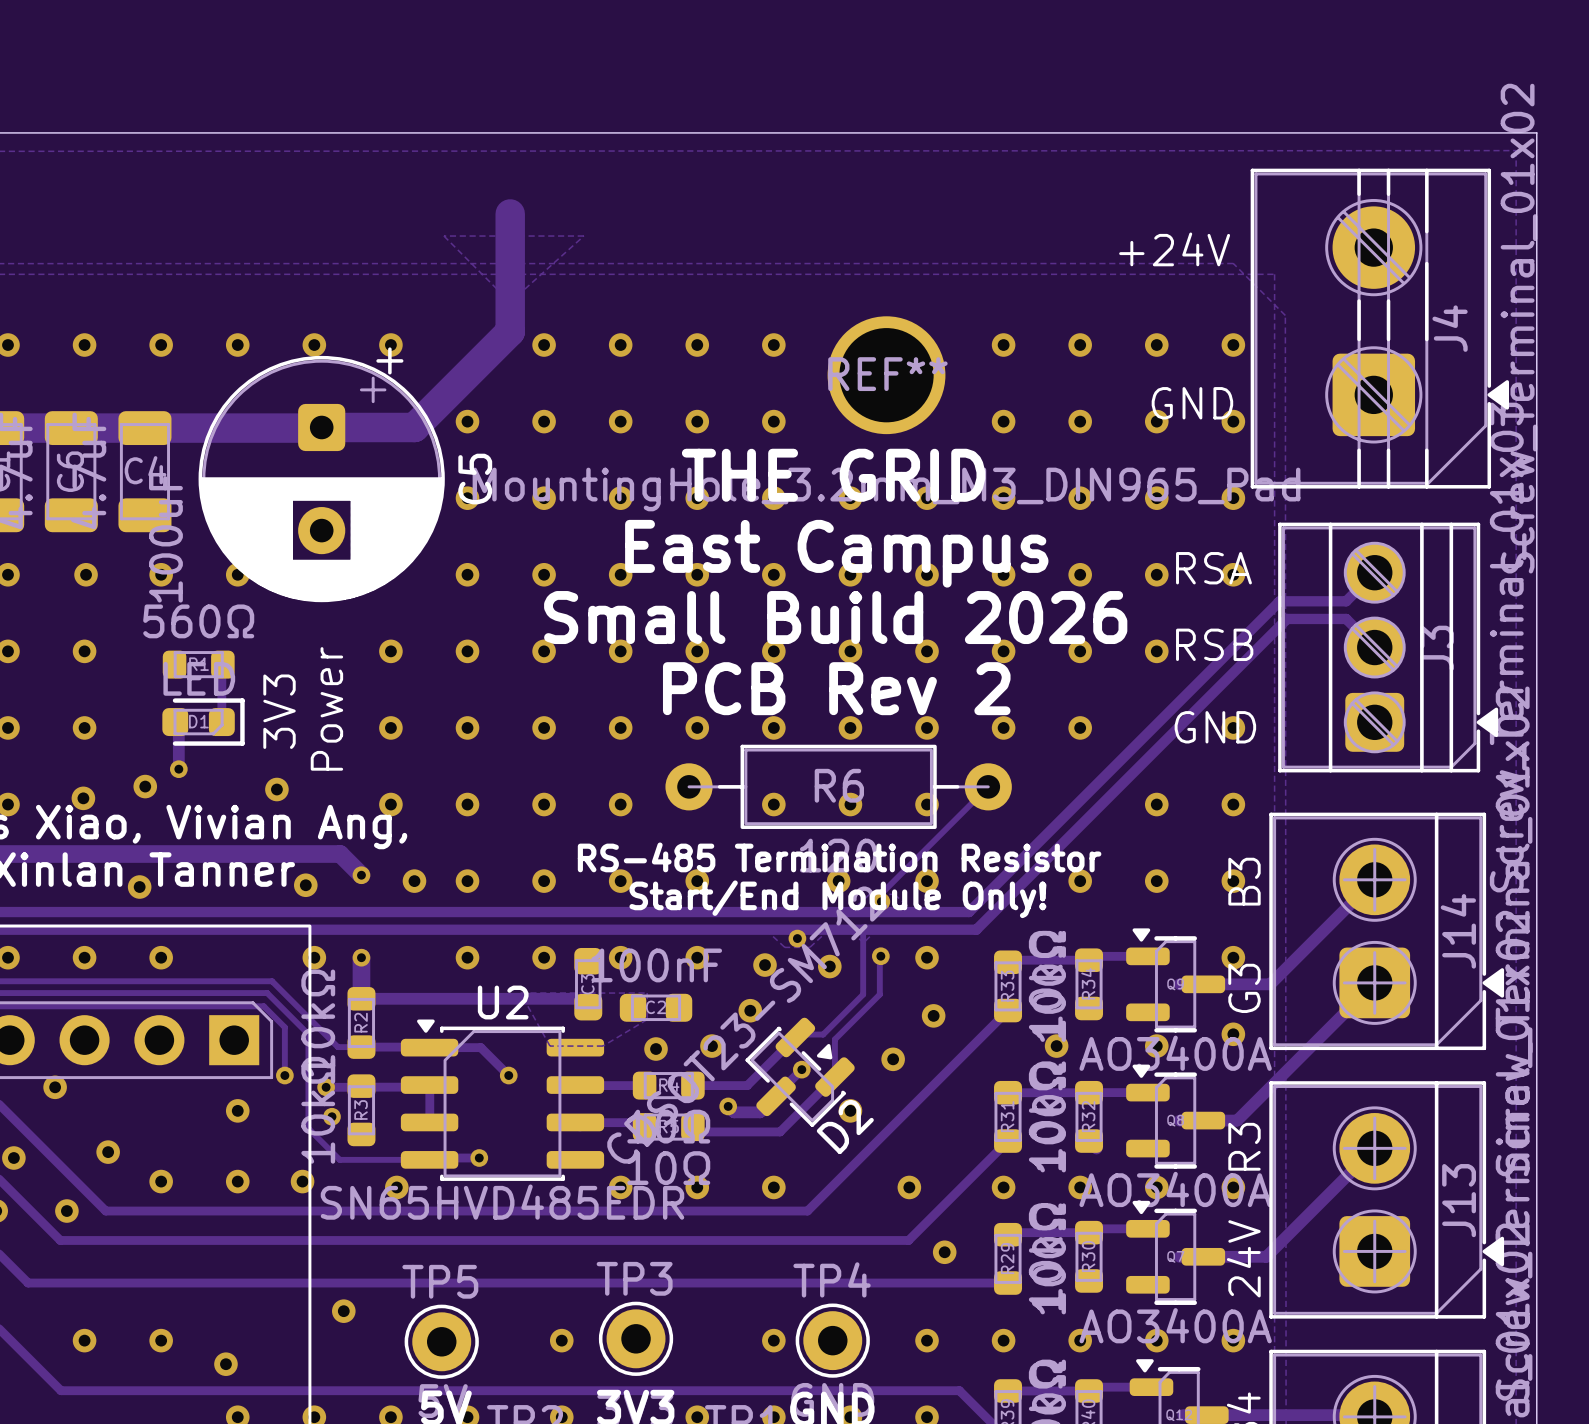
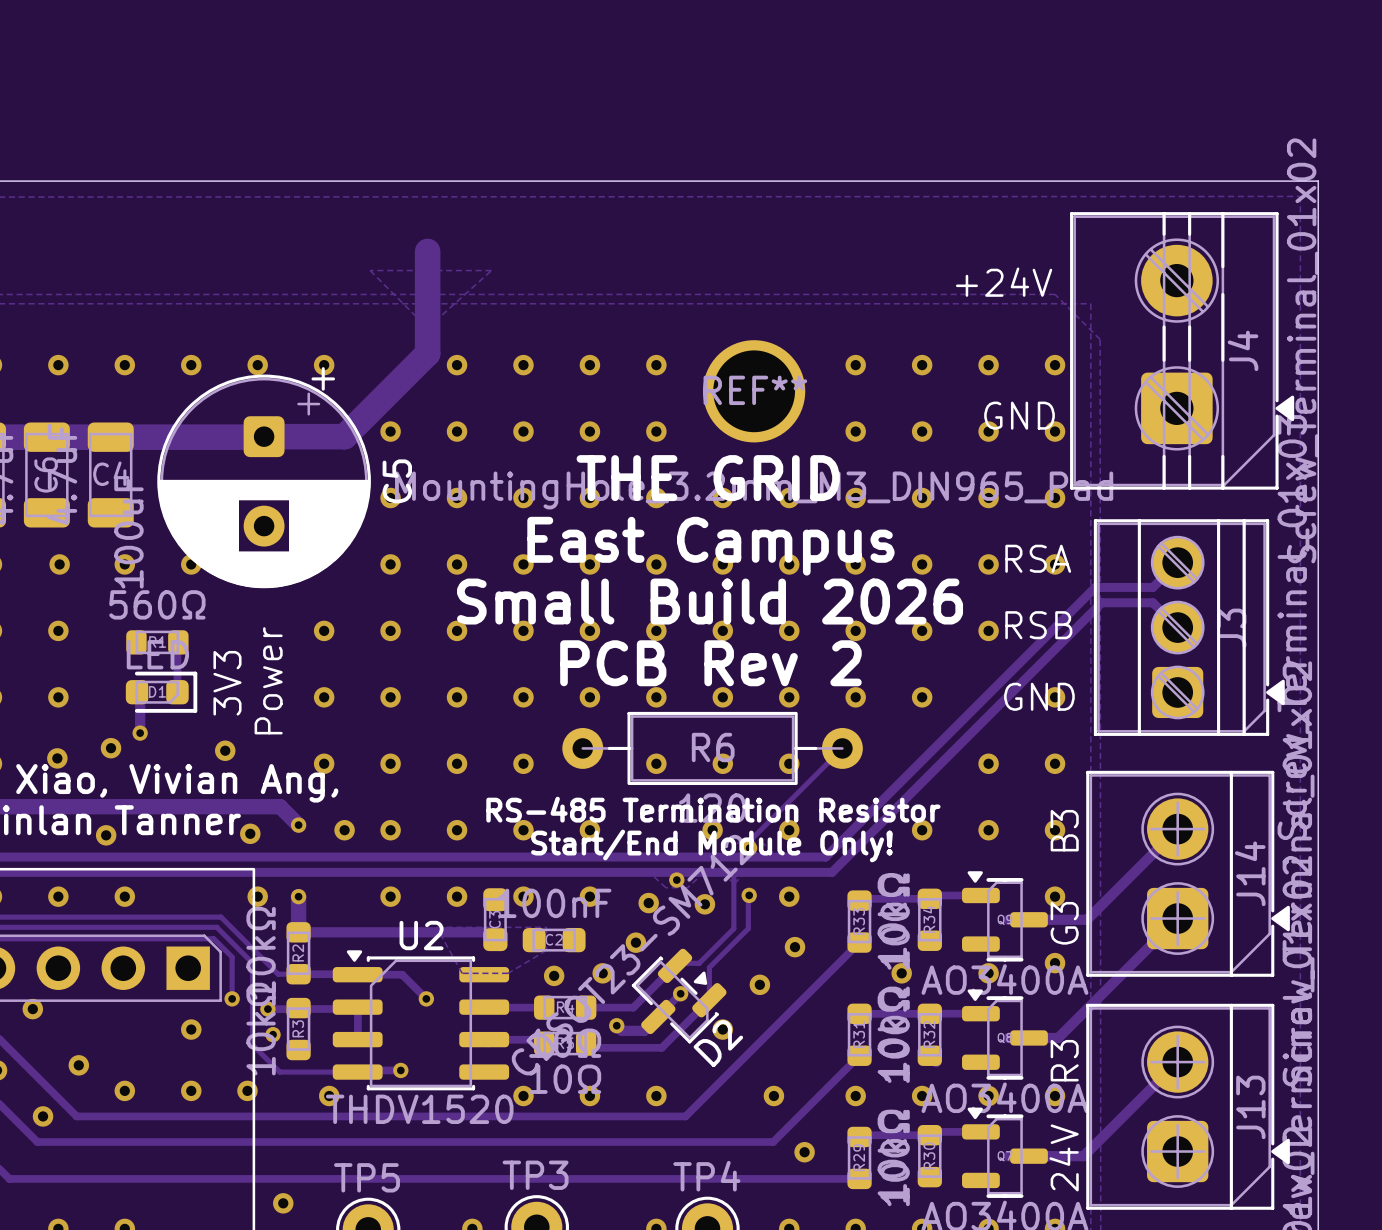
U2 value: SN65HVD485EDR (502, 1202) -> THDV1520 (419, 1109)

